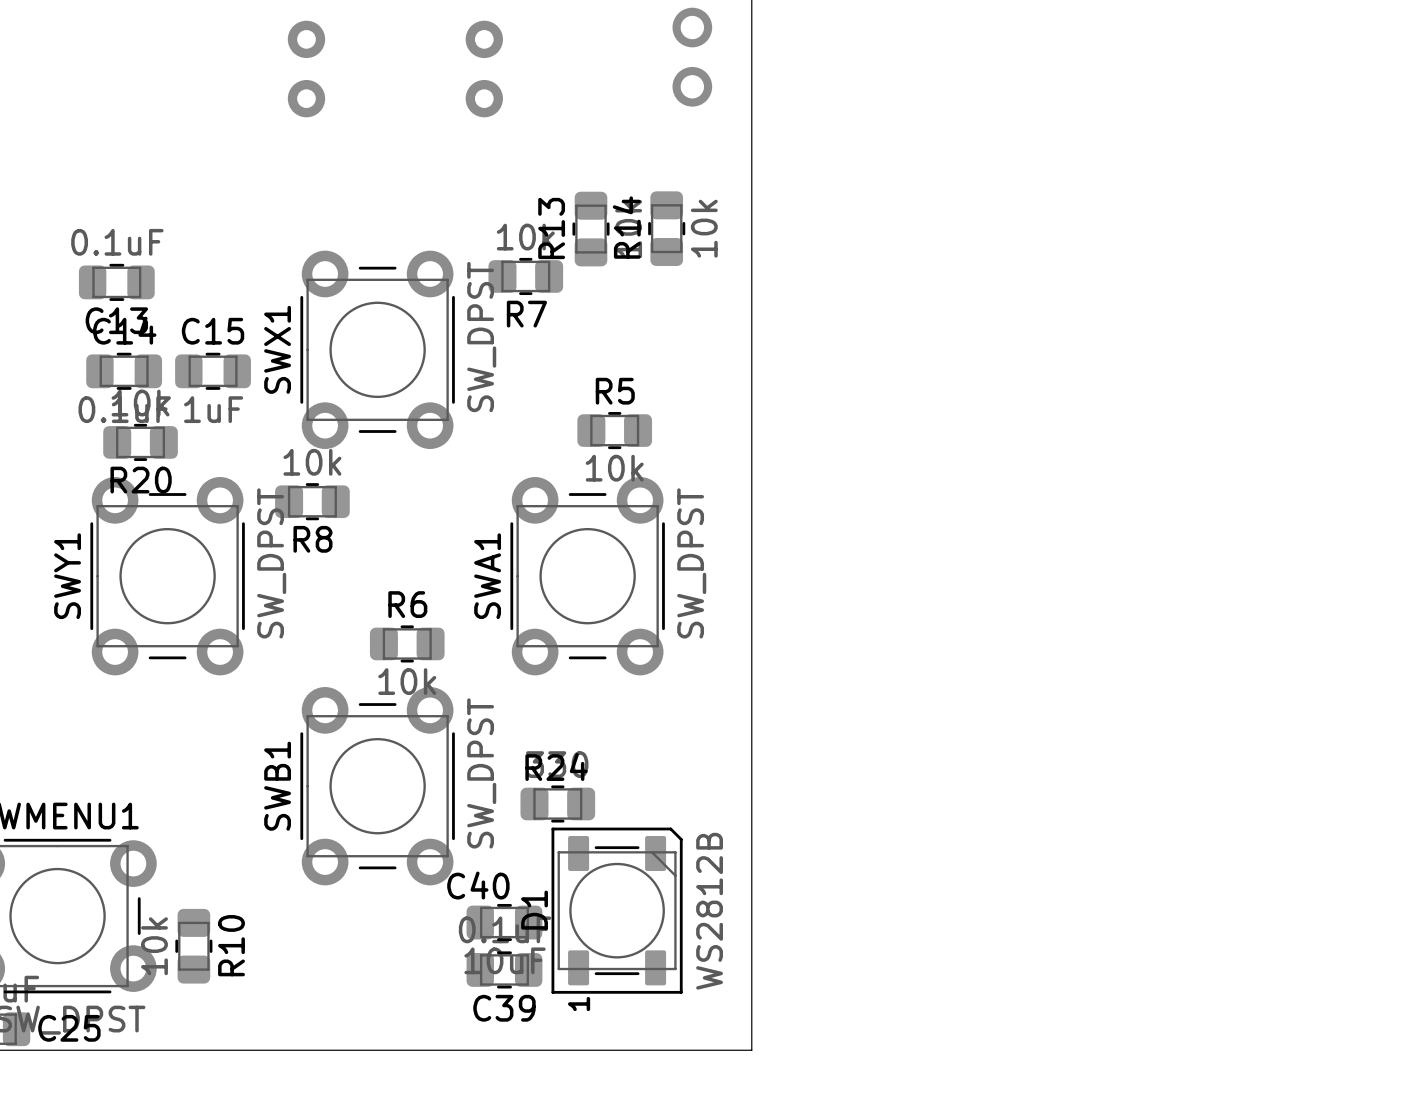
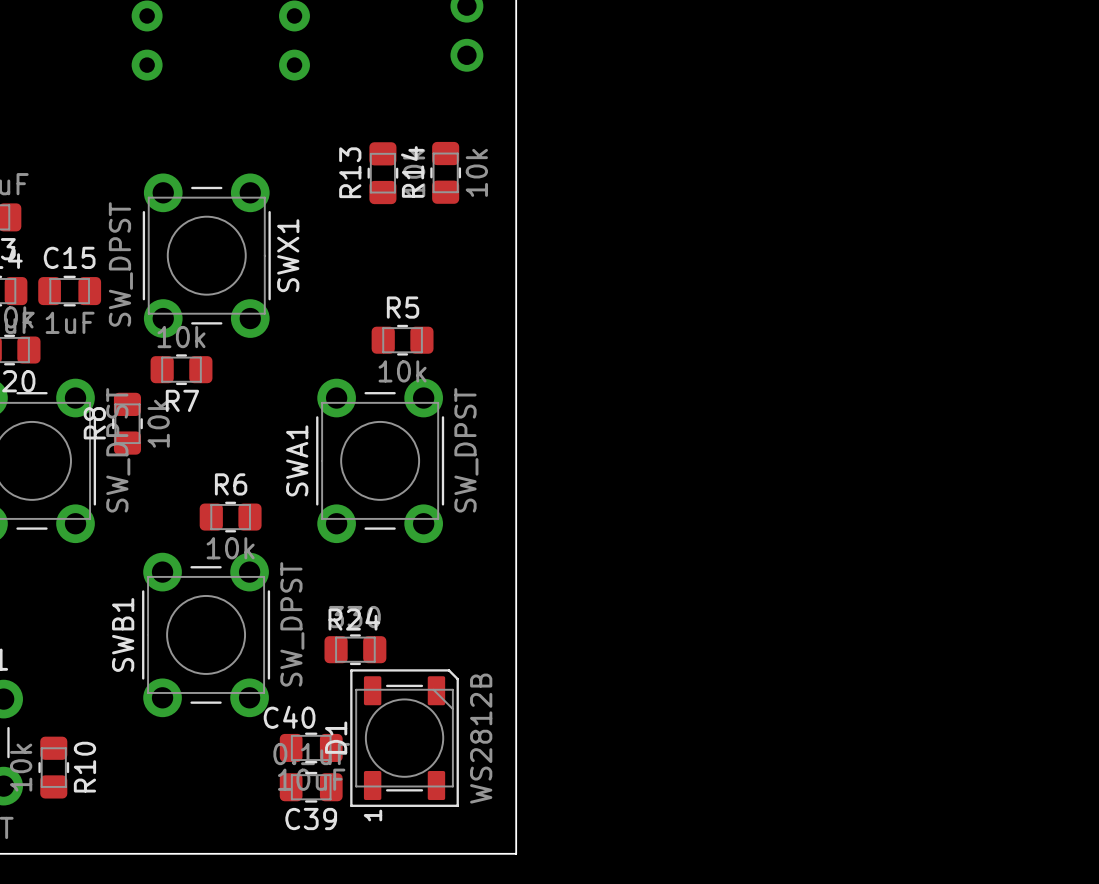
R7 position: (525, 276) -> (181, 369)
SWX1 rotation: 0° (377, 349) -> 180° (206, 255)
R8 rotation: 0° (312, 501) -> 90° clockwise (127, 423)

